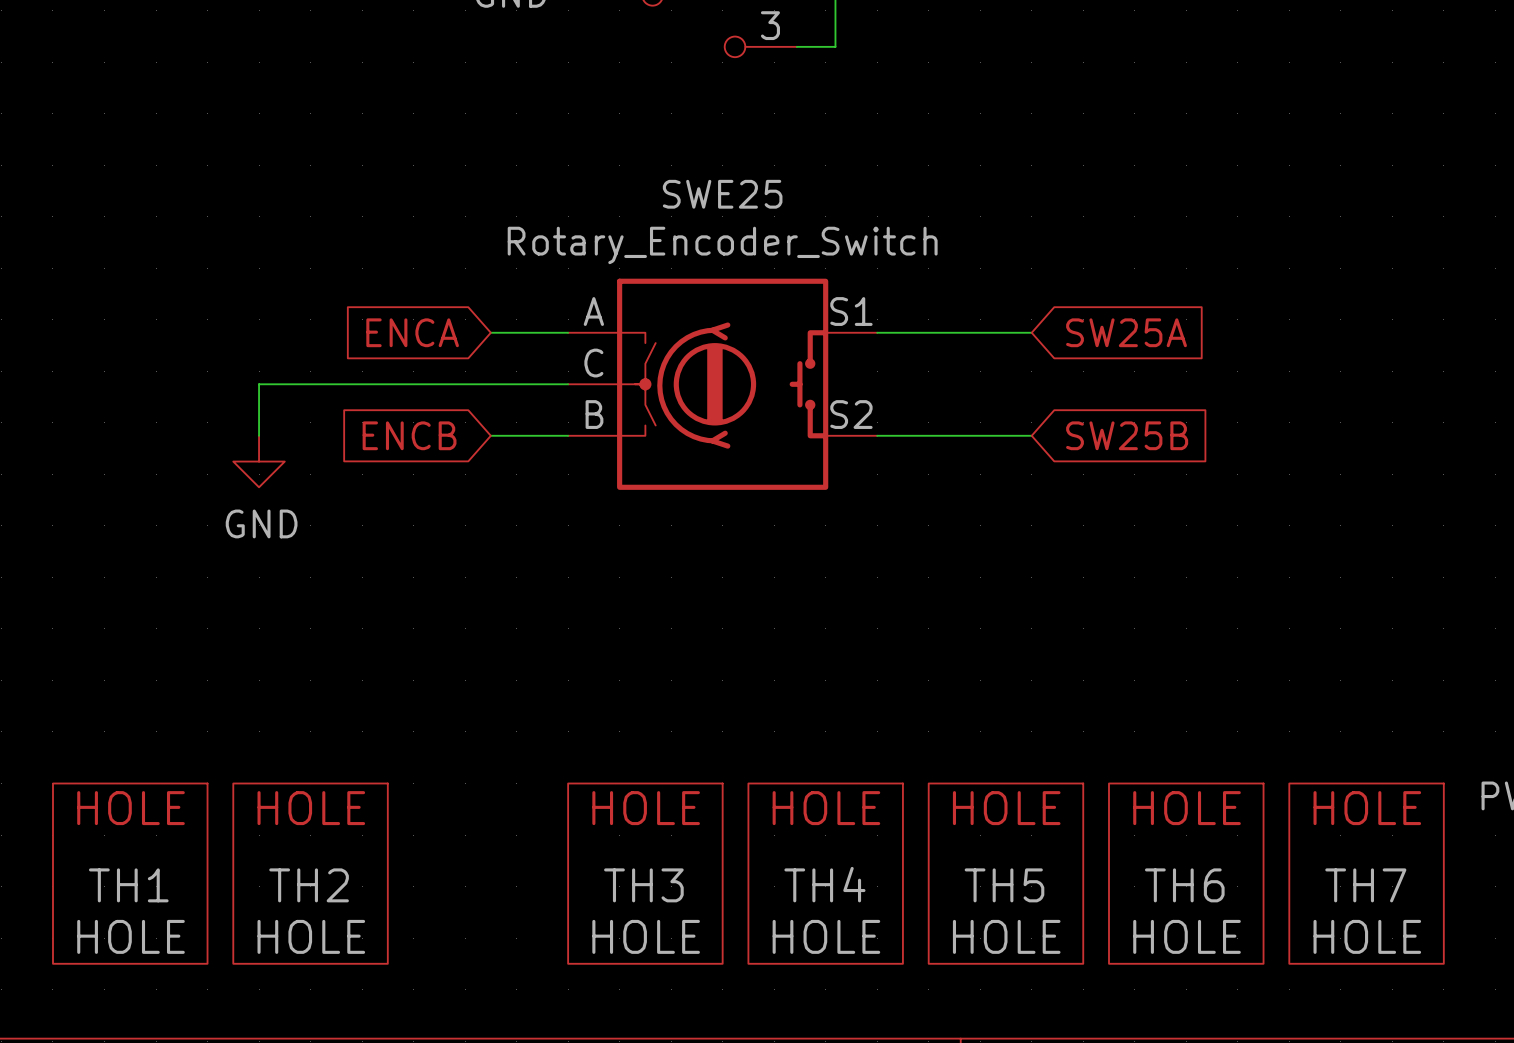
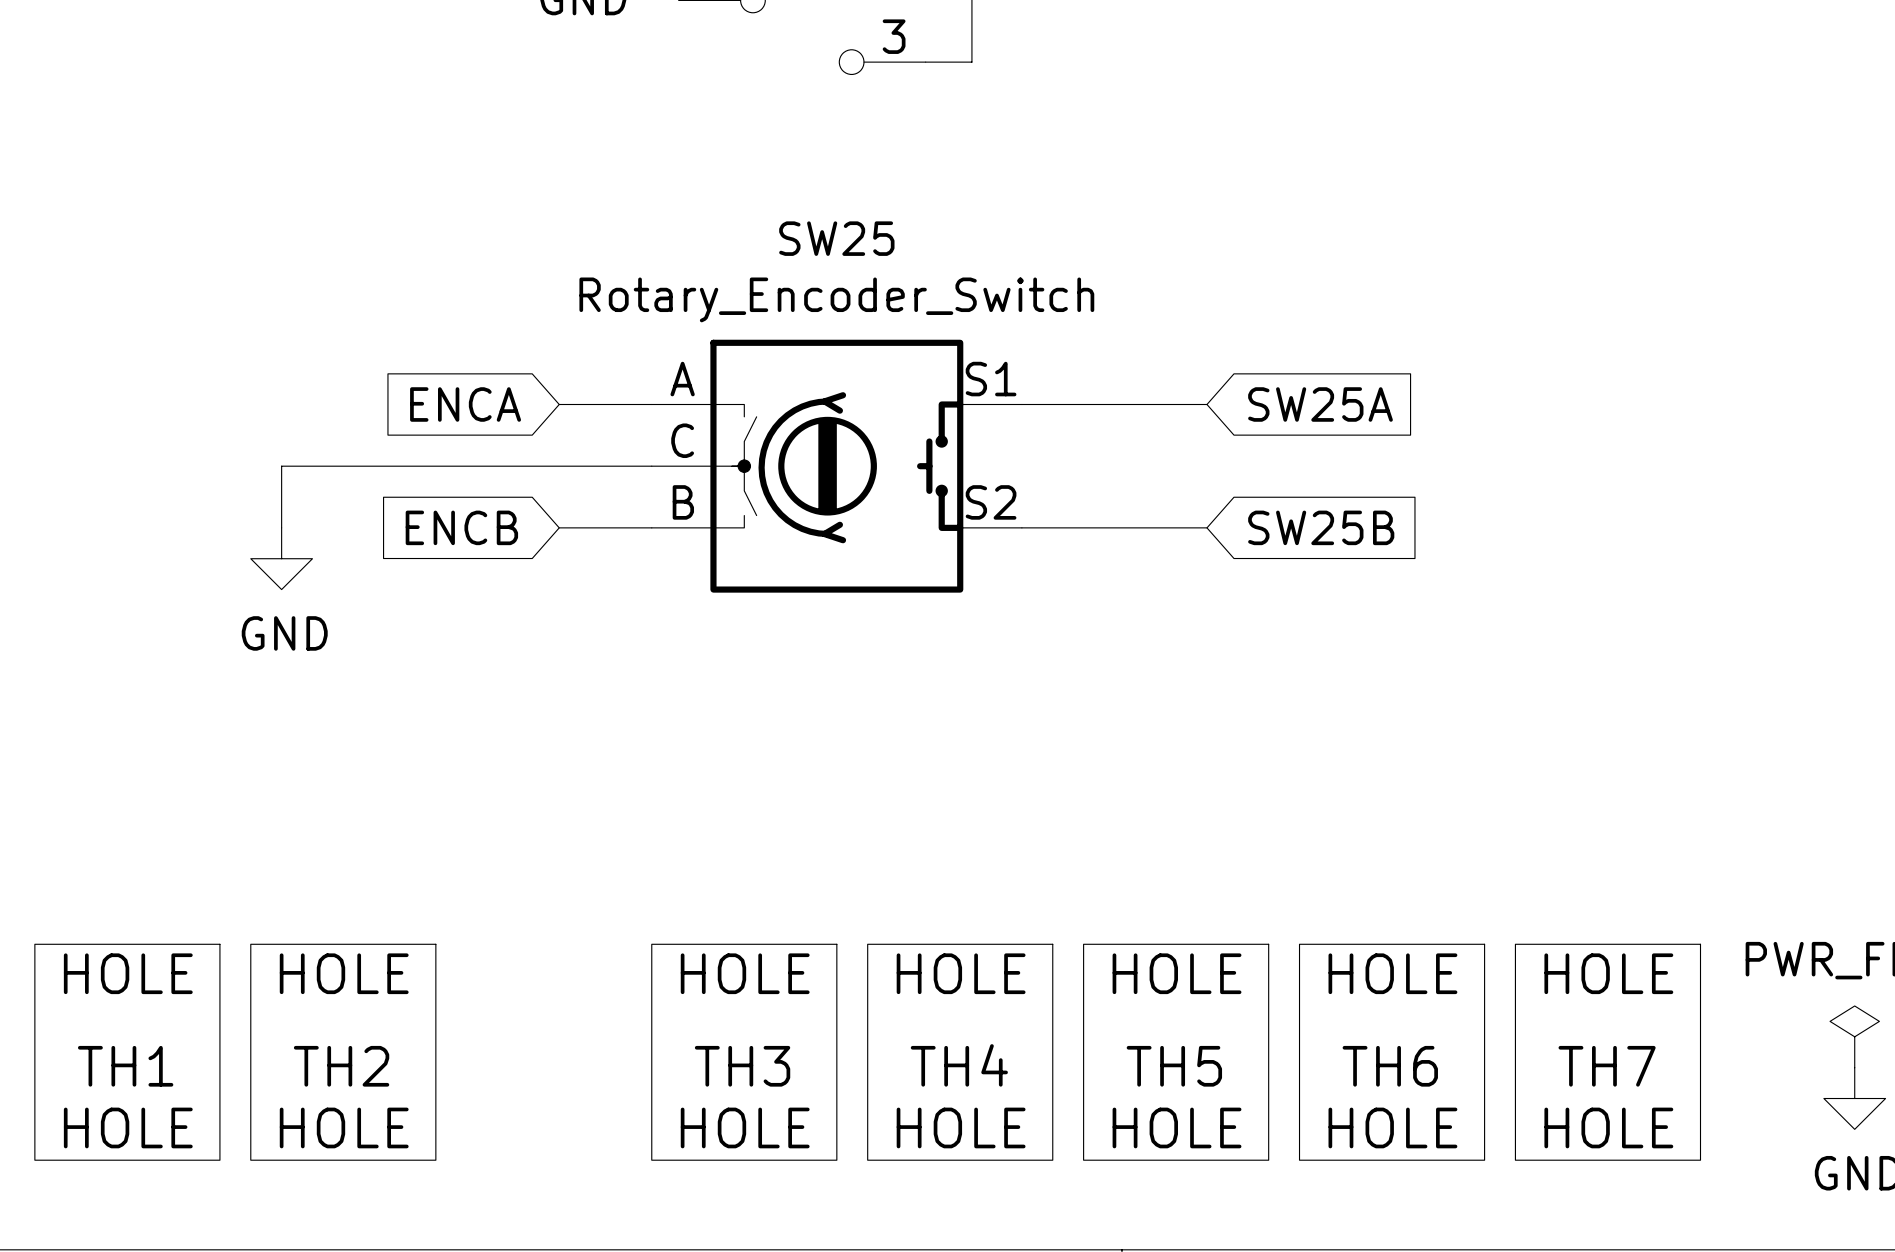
SWE25 name: SWE25 (722, 194) -> SW25 (836, 238)

